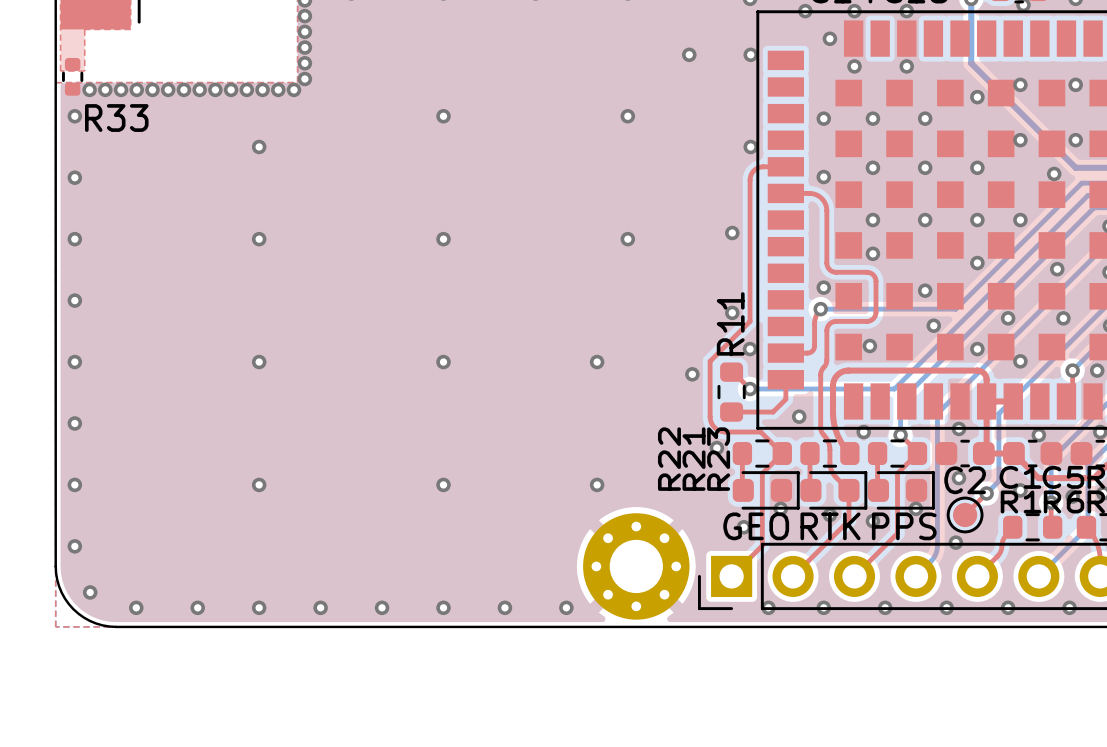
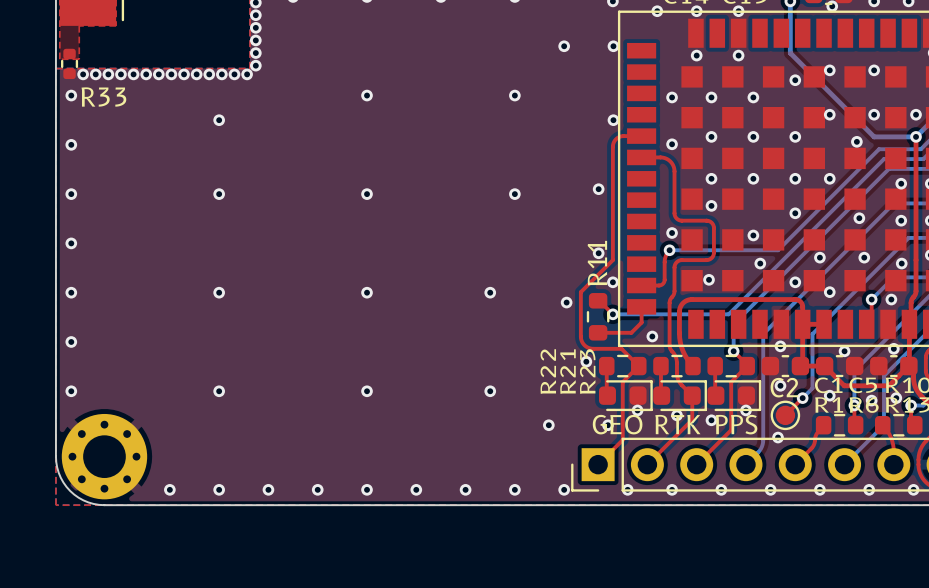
via: (829, 38) -> none
via: (863, 432) -> none
via: none -> (548, 425)
via: (74, 546) -> none
part position: (636, 566) -> (104, 456)
via: (90, 592) -> none
via: (136, 607) -> none
via: none -> (514, 489)
via: none -> (564, 489)

